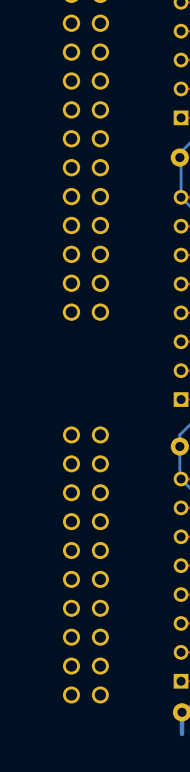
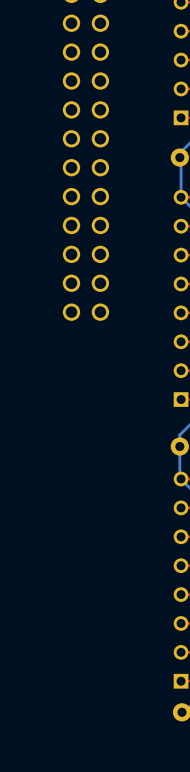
part: (85, 564) -> none
bottom track: (182, 712) (182, 733) -> none

